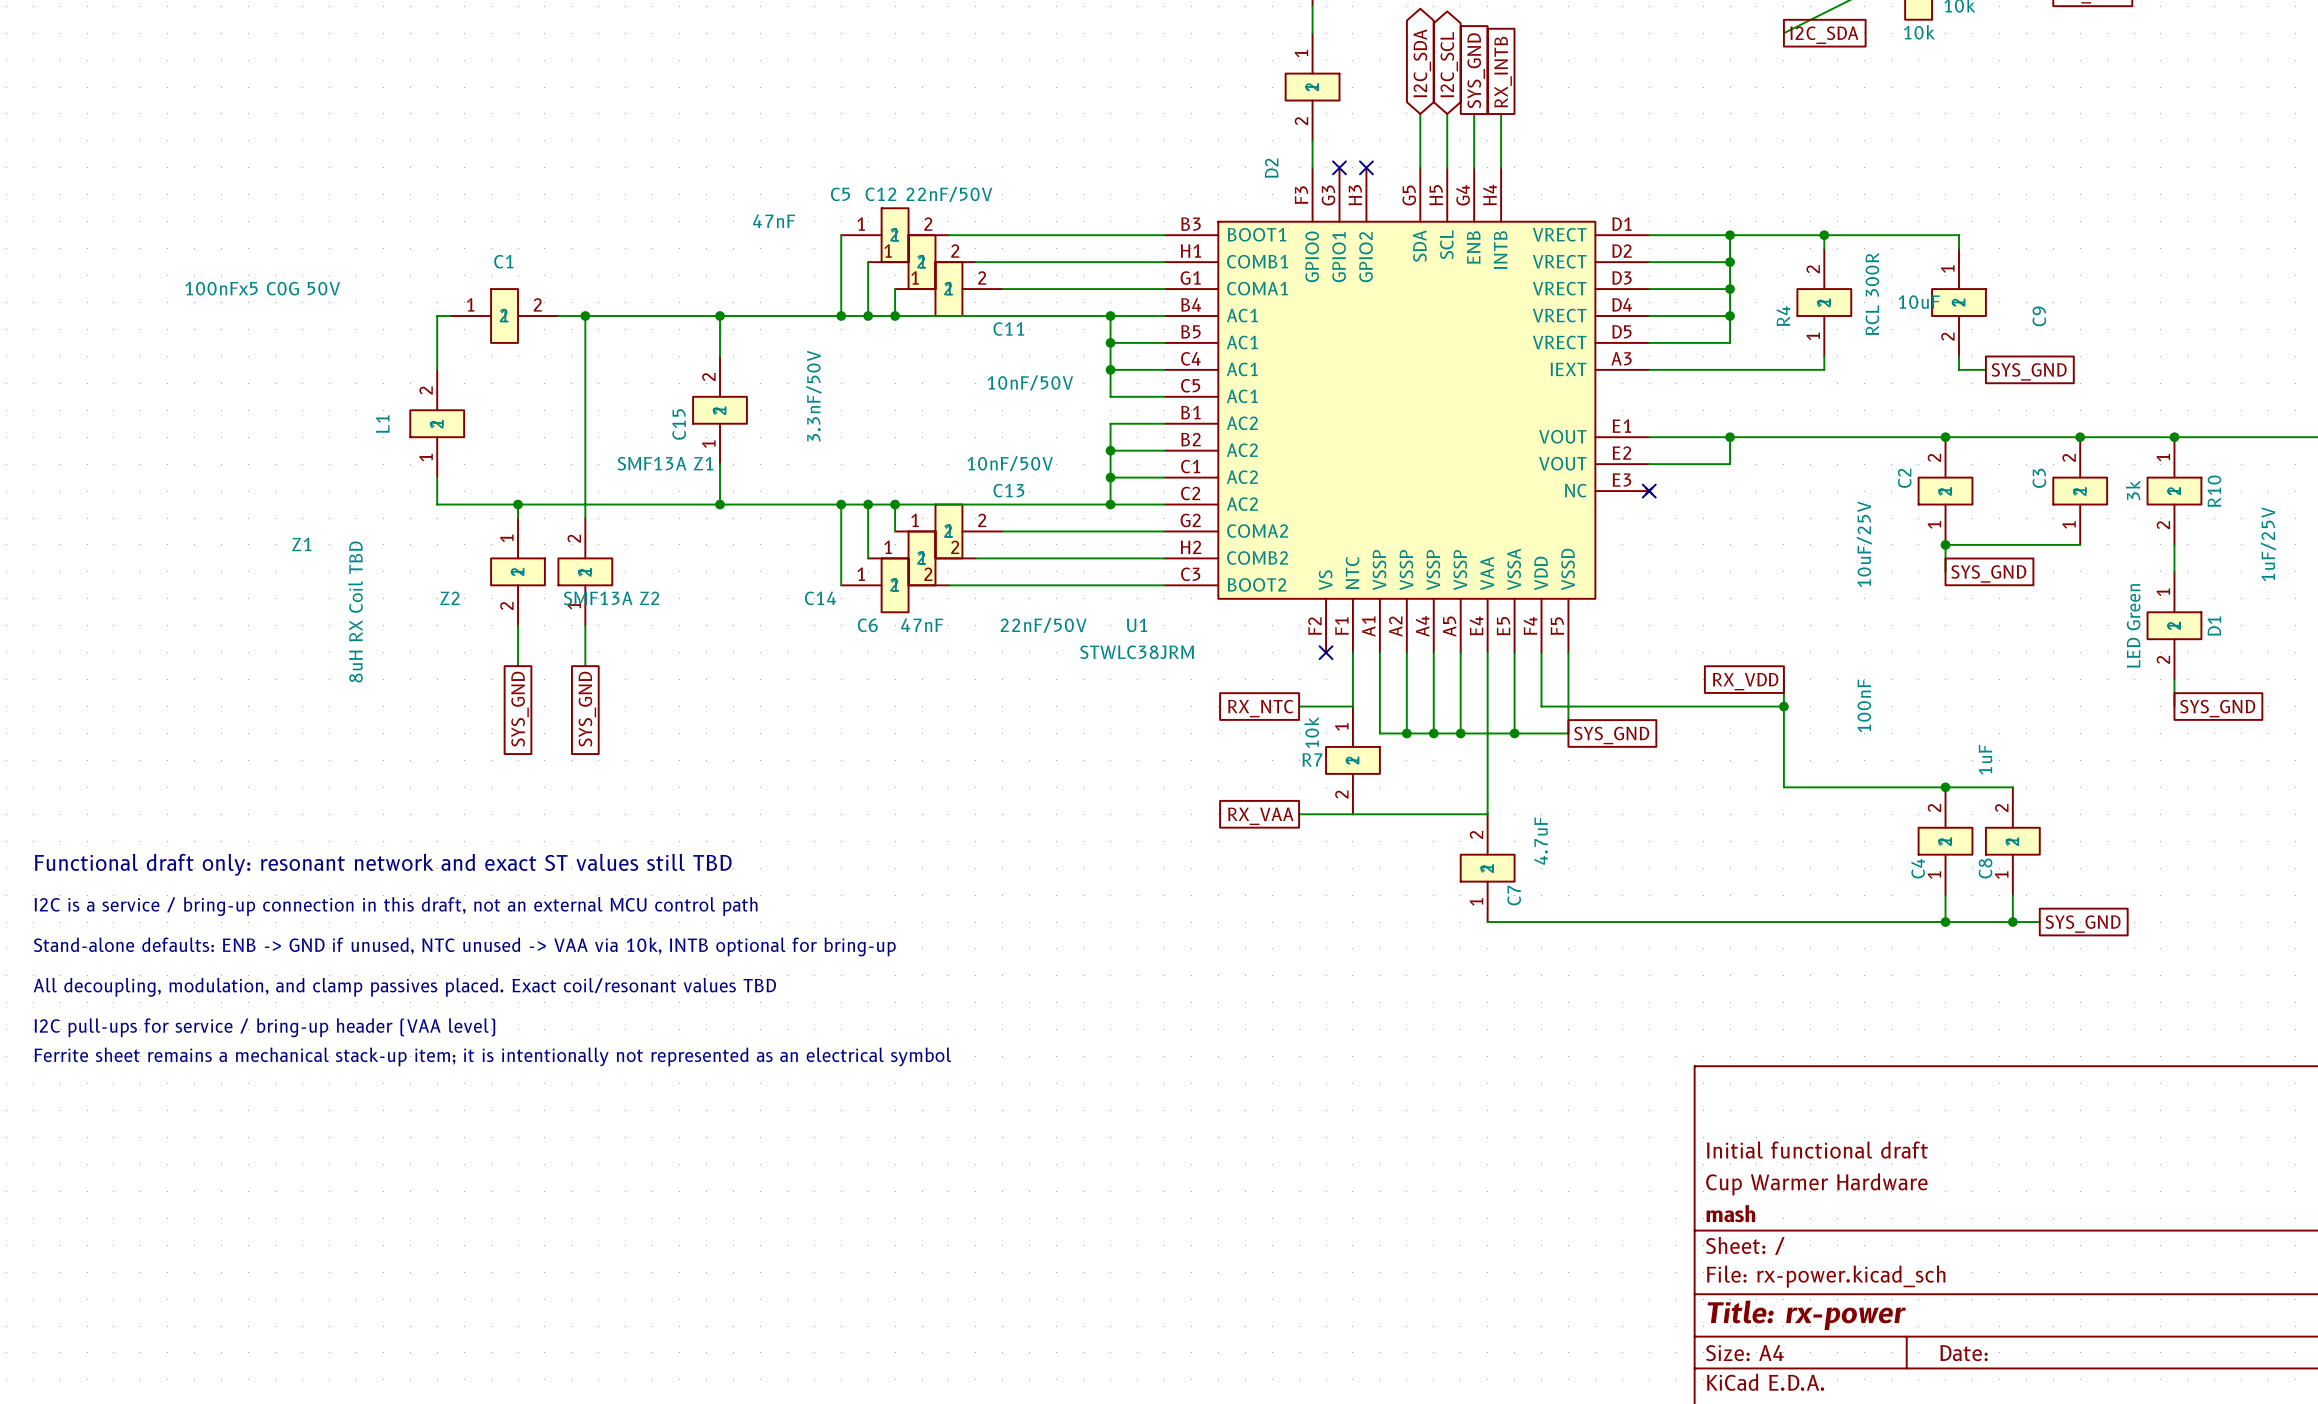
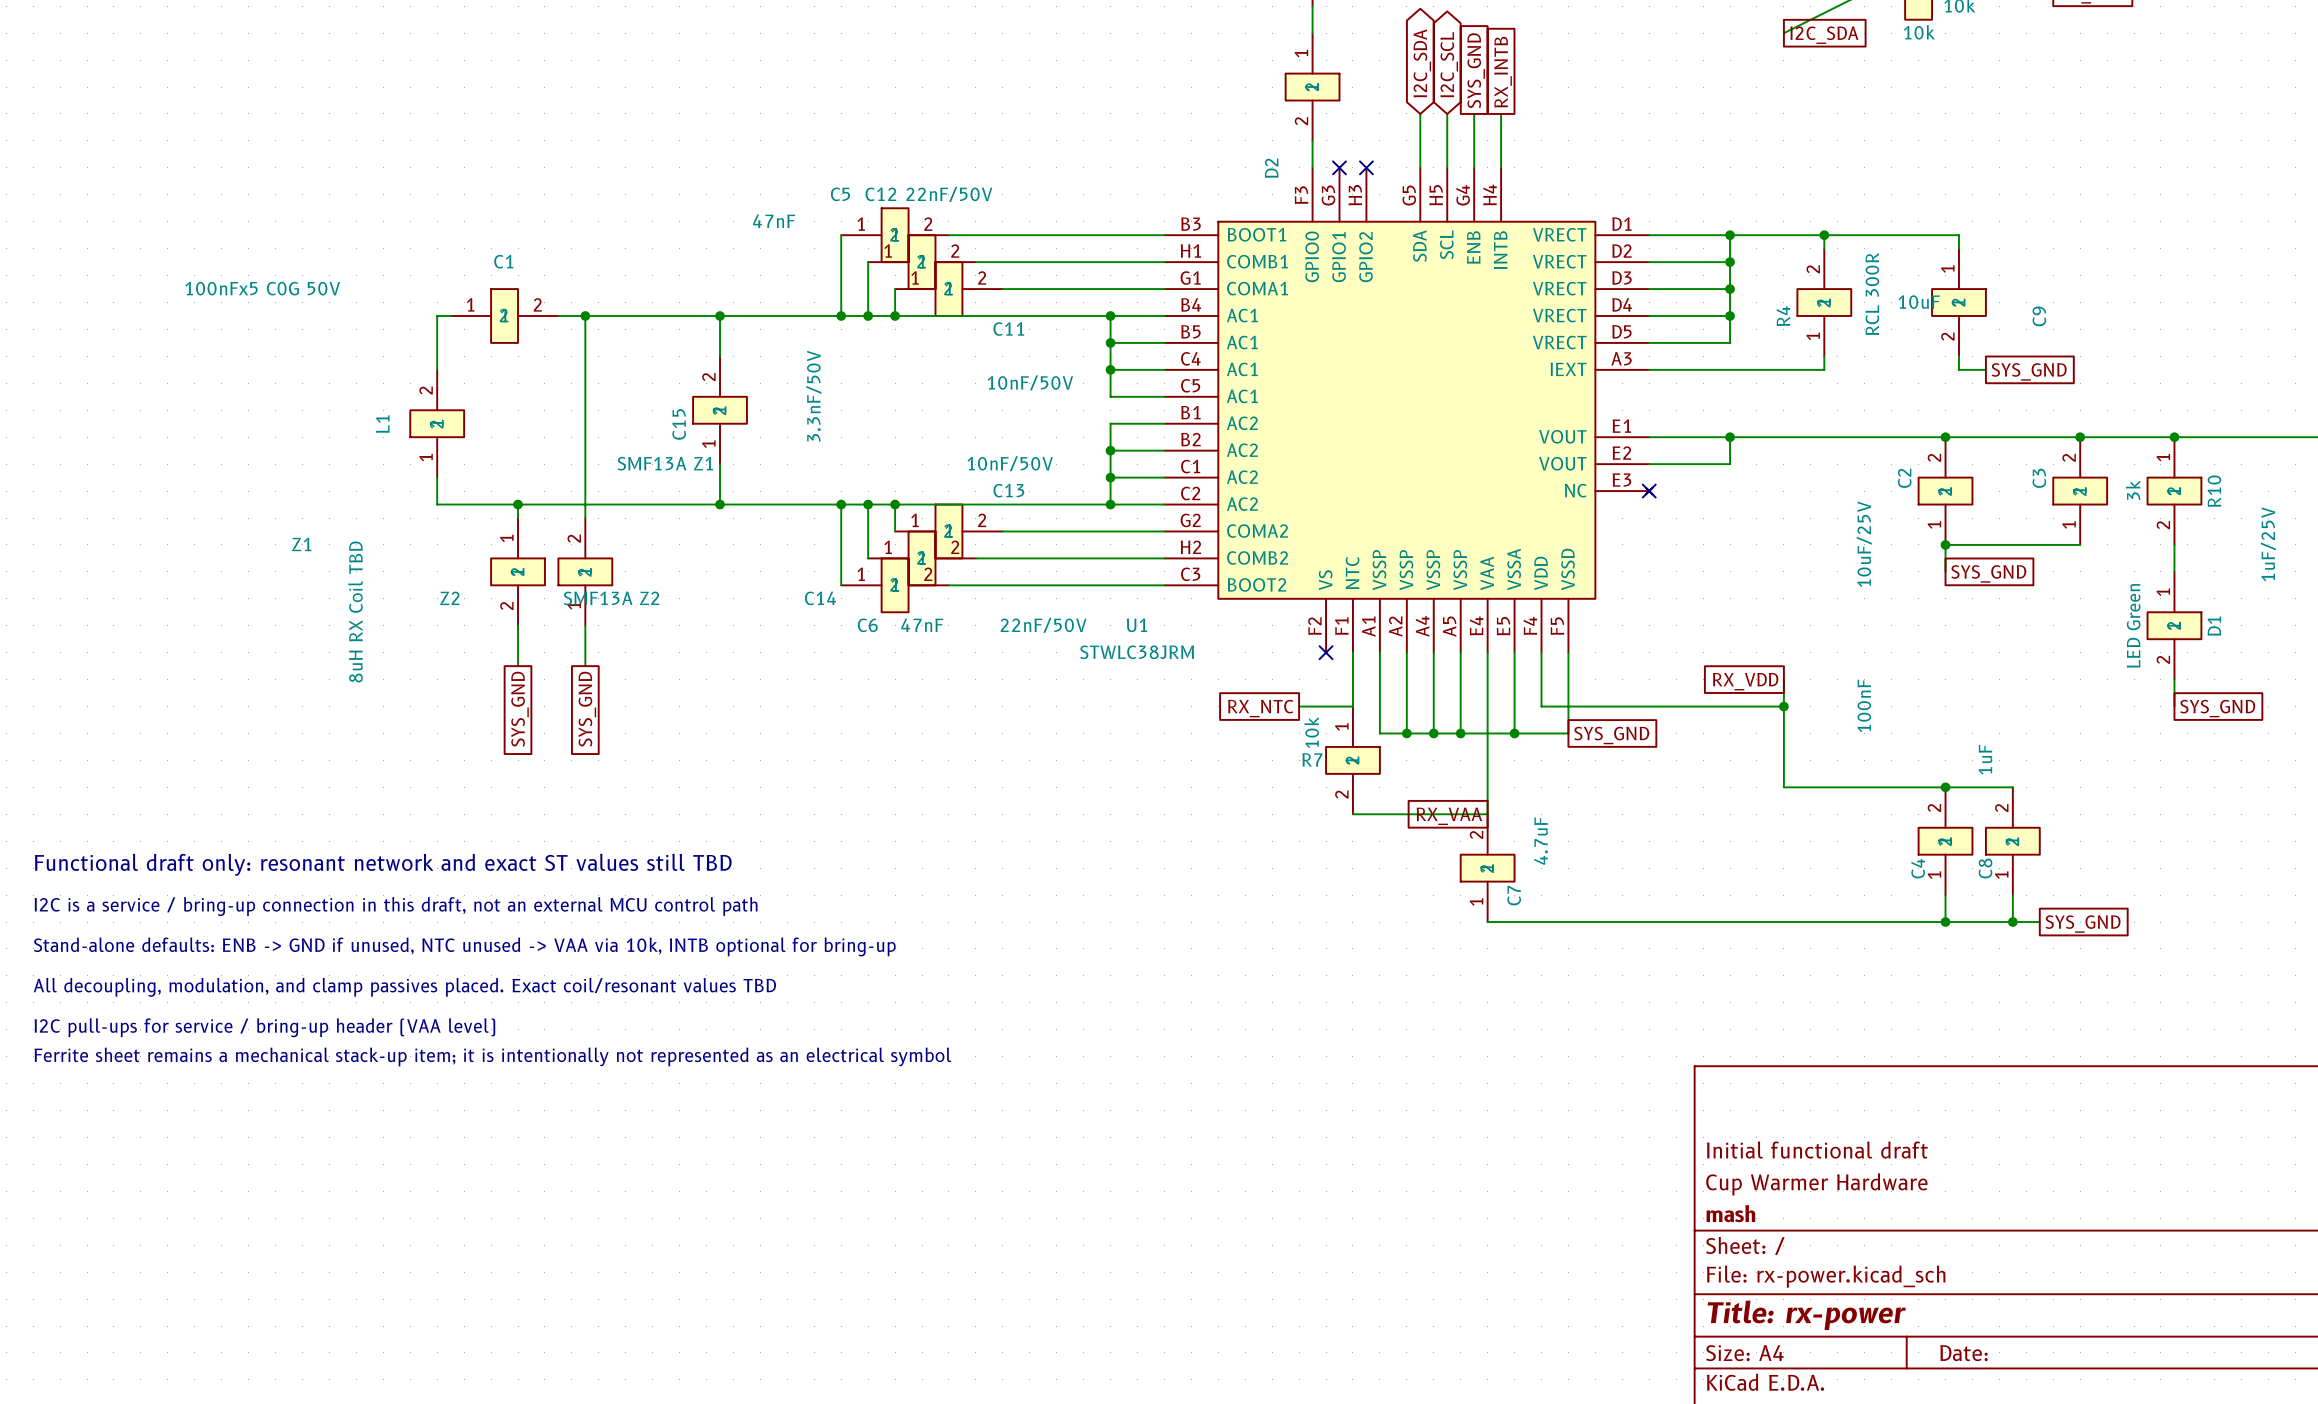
wire: (1299, 814) (1352, 814) -> none
global label position: RX_VAA (1260, 816) -> RX_VAA (1449, 816)

